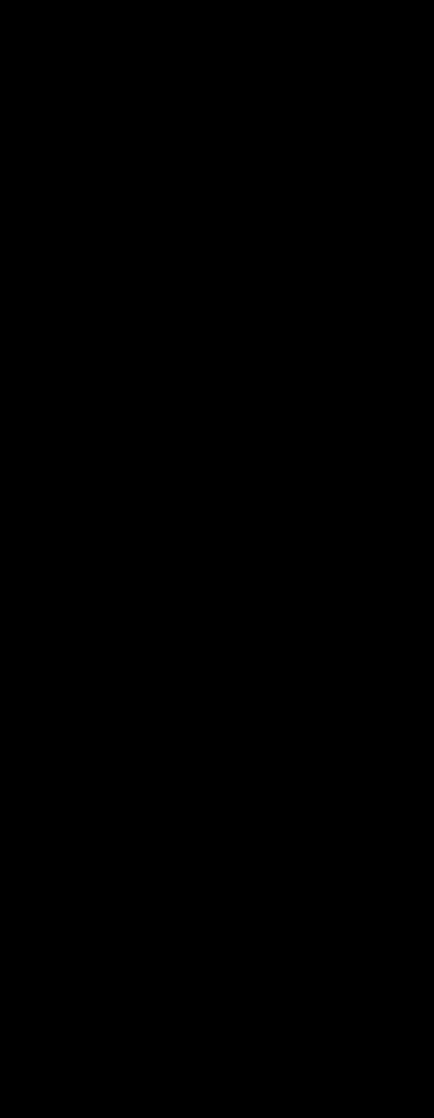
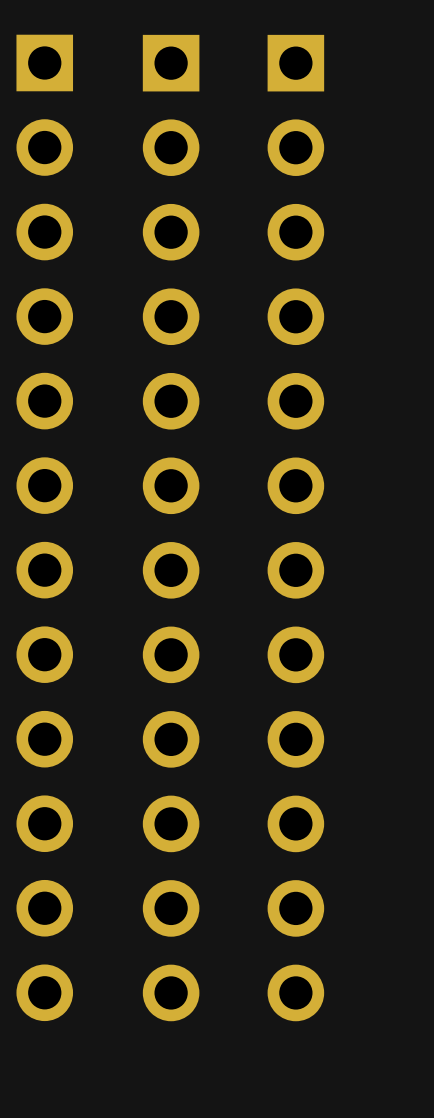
part: none -> (44, 527)
part: none -> (171, 528)
part: none -> (295, 528)

